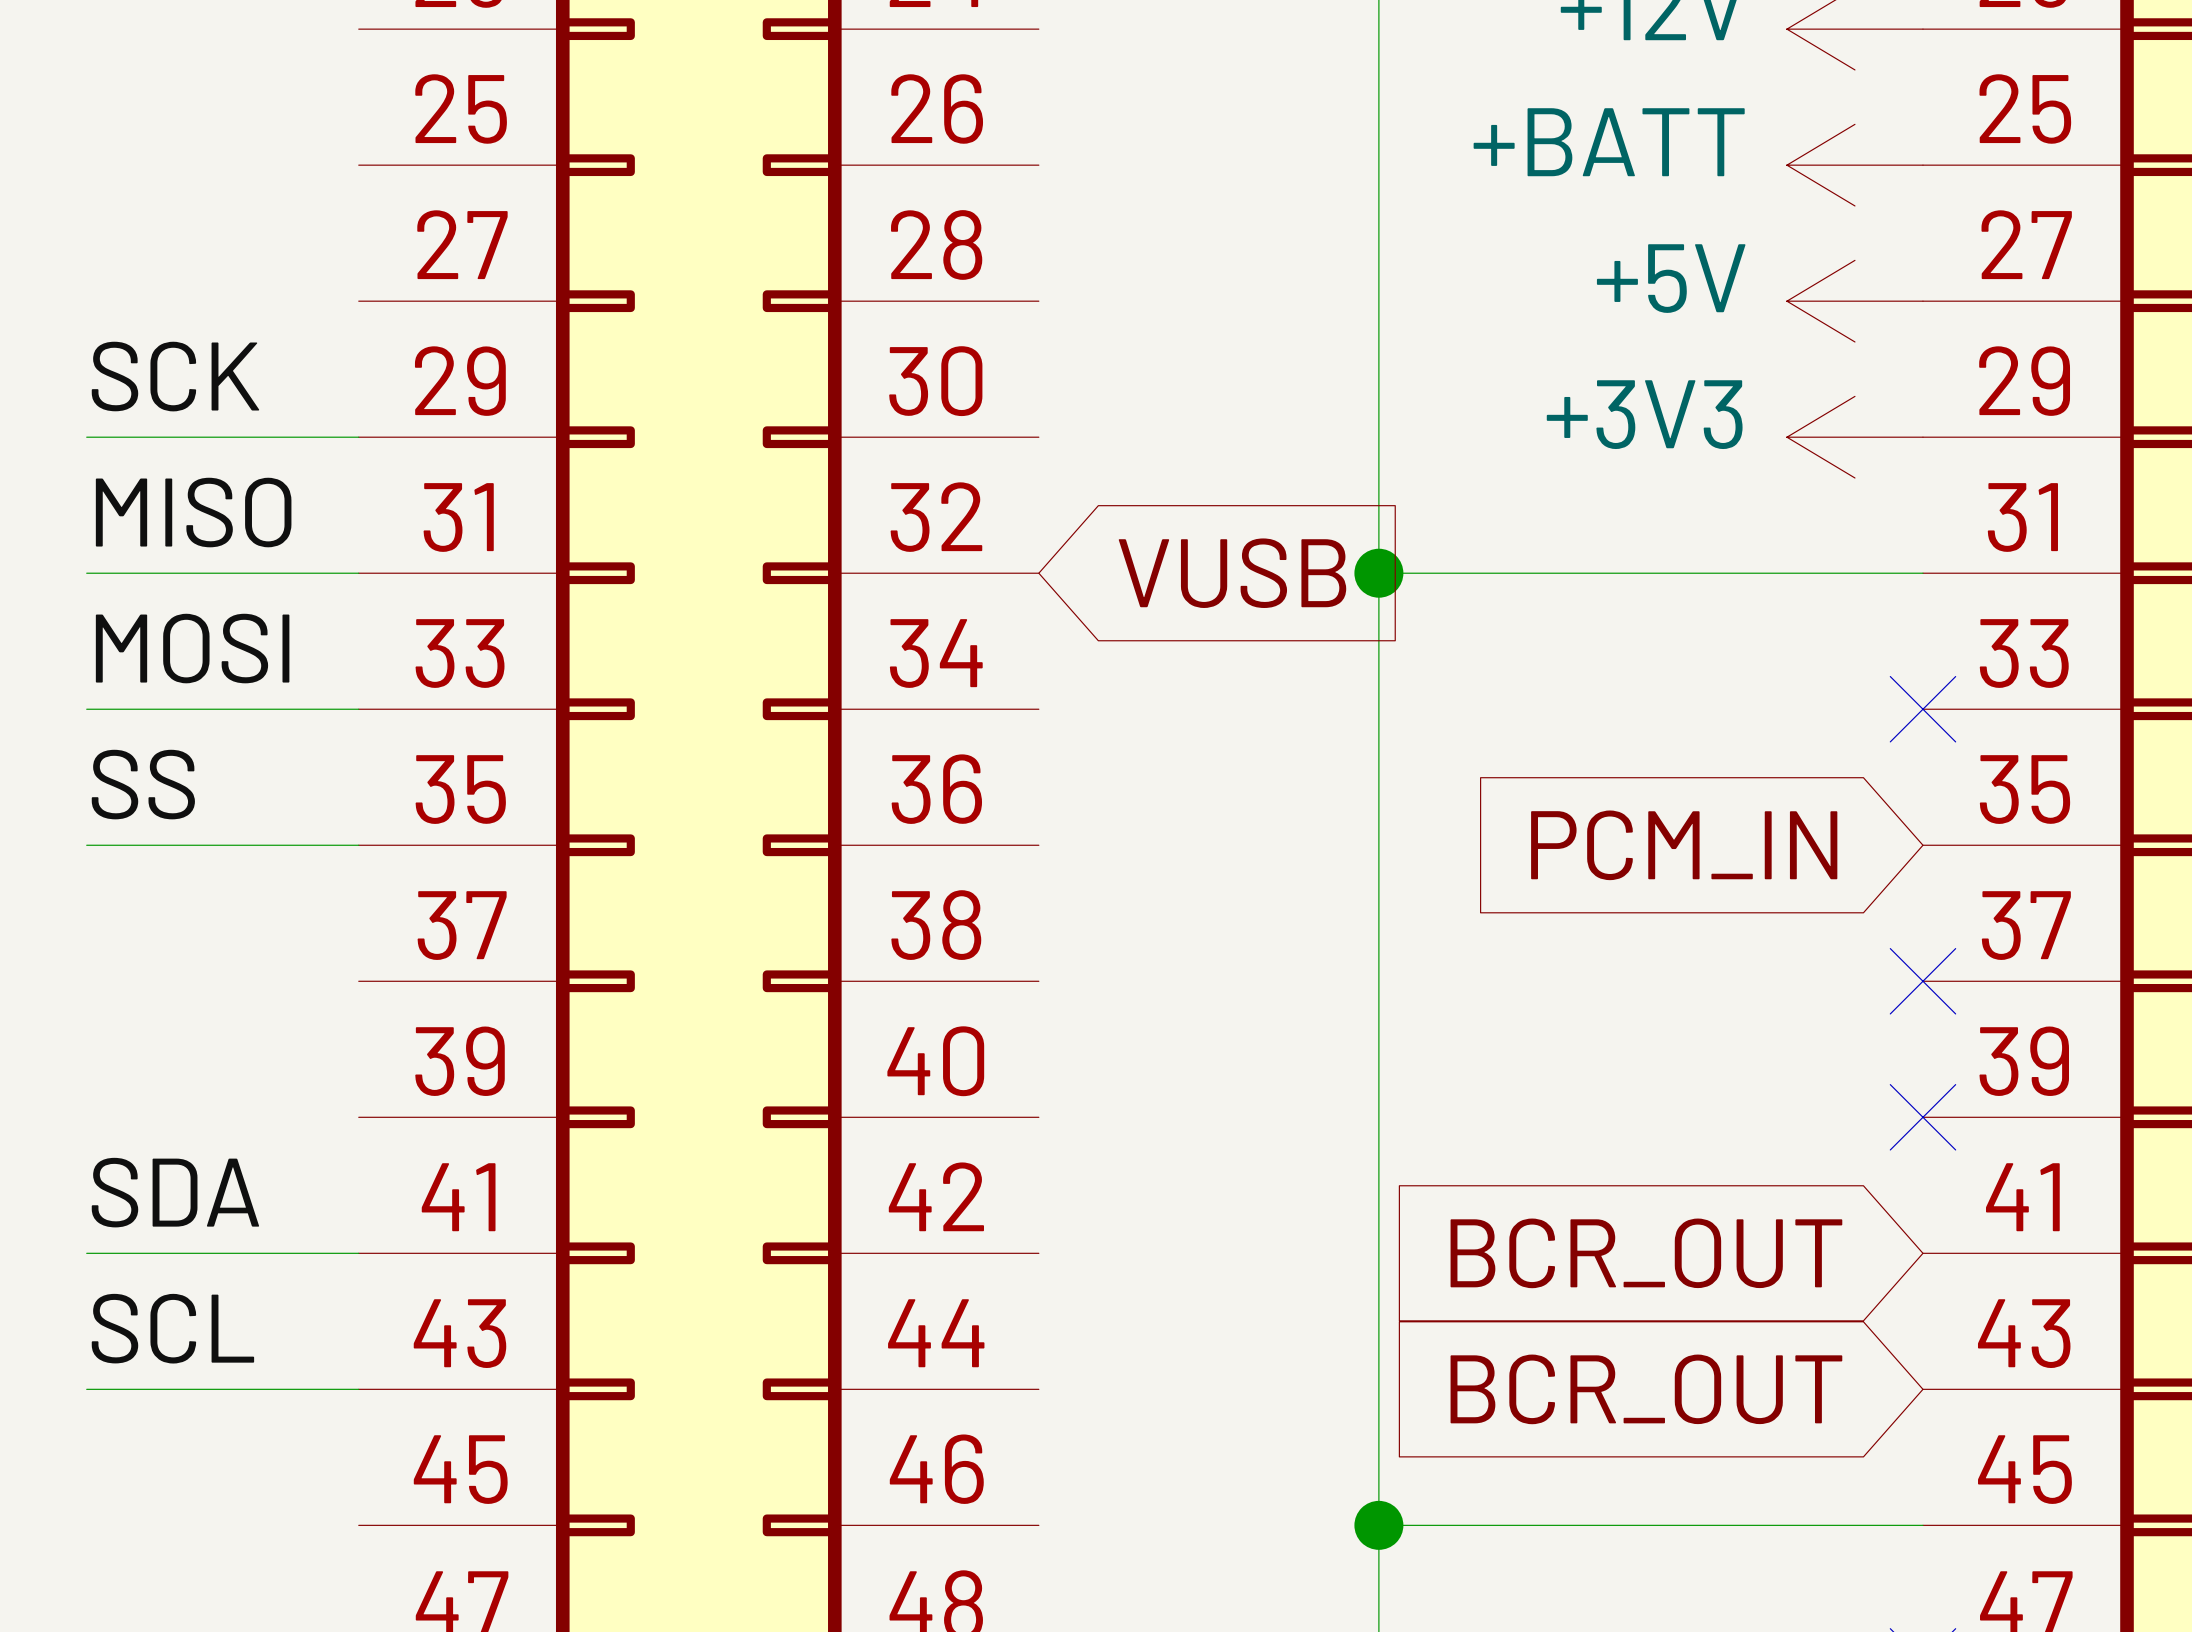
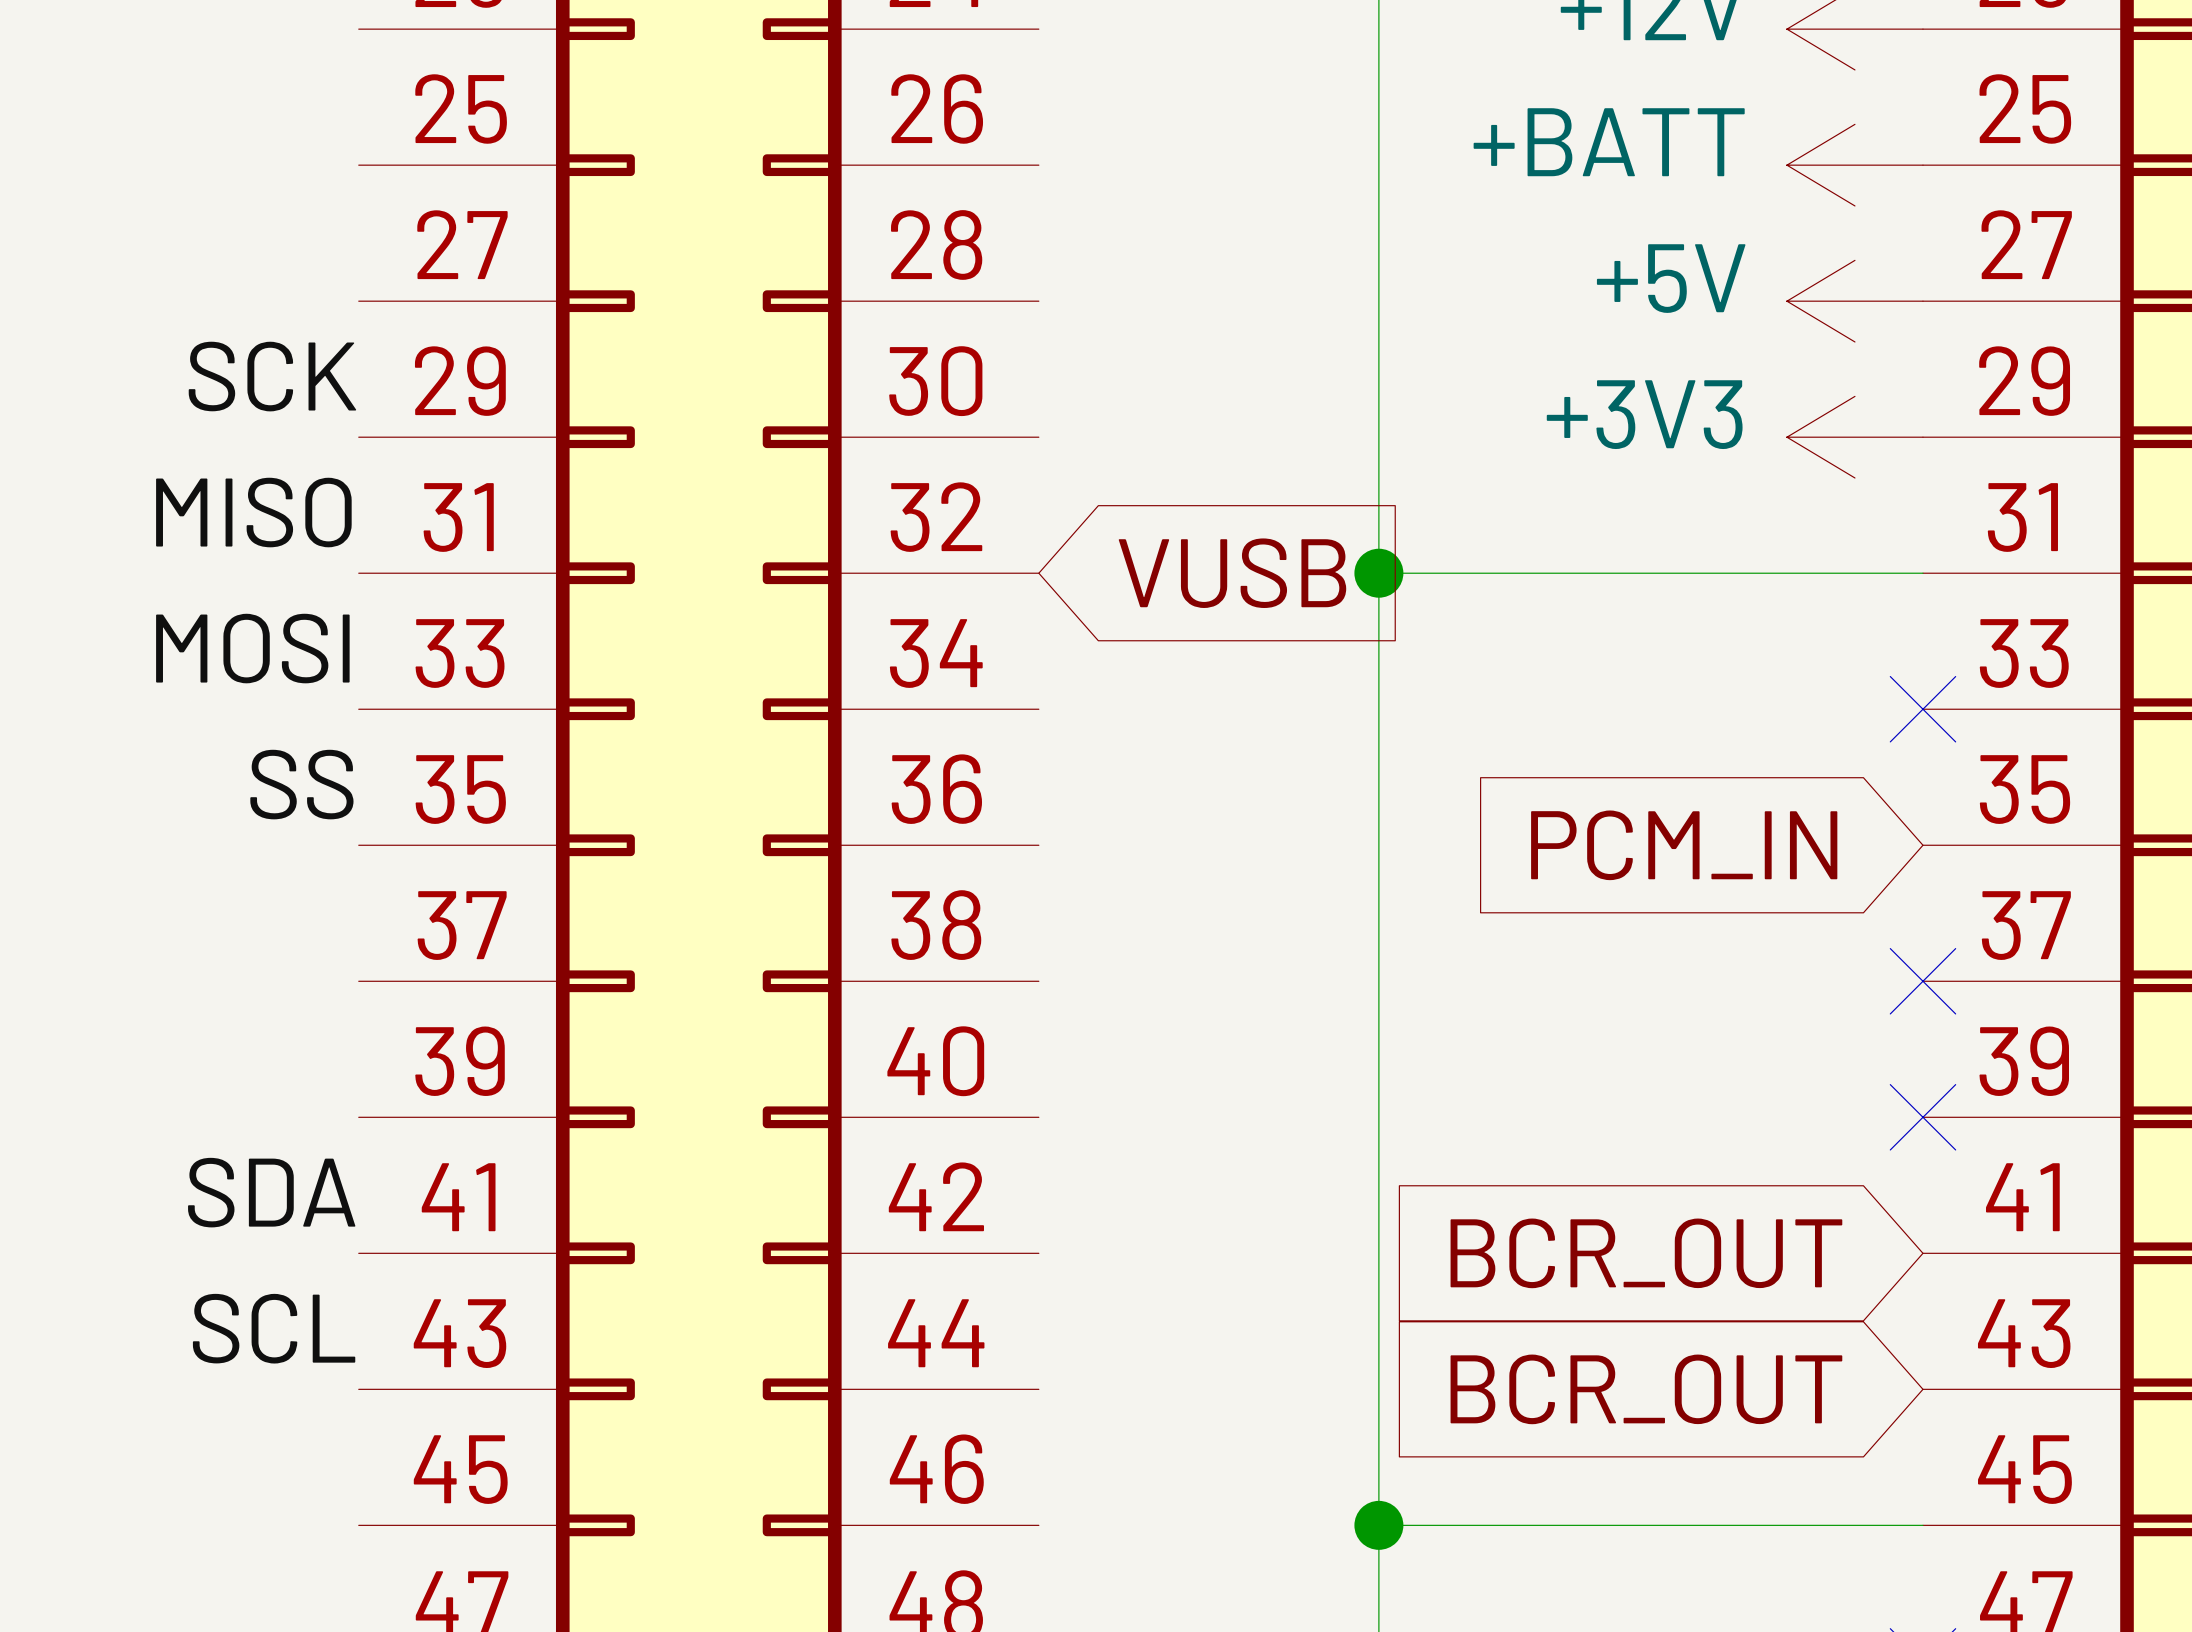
label position: SCK (175, 376) -> SCK (272, 376)
wire: (86, 437) (358, 437) -> none
label position: MISO (193, 512) -> MISO (253, 512)
wire: (86, 573) (358, 573) -> none
label position: MOSI (192, 648) -> MOSI (252, 648)
wire: (86, 709) (358, 709) -> none
label position: SS (143, 784) -> SS (301, 784)
wire: (86, 845) (358, 845) -> none
label position: SDA (175, 1192) -> SDA (271, 1192)
wire: (86, 1253) (358, 1253) -> none
label position: SCL (172, 1328) -> SCL (274, 1328)
wire: (86, 1389) (358, 1389) -> none

